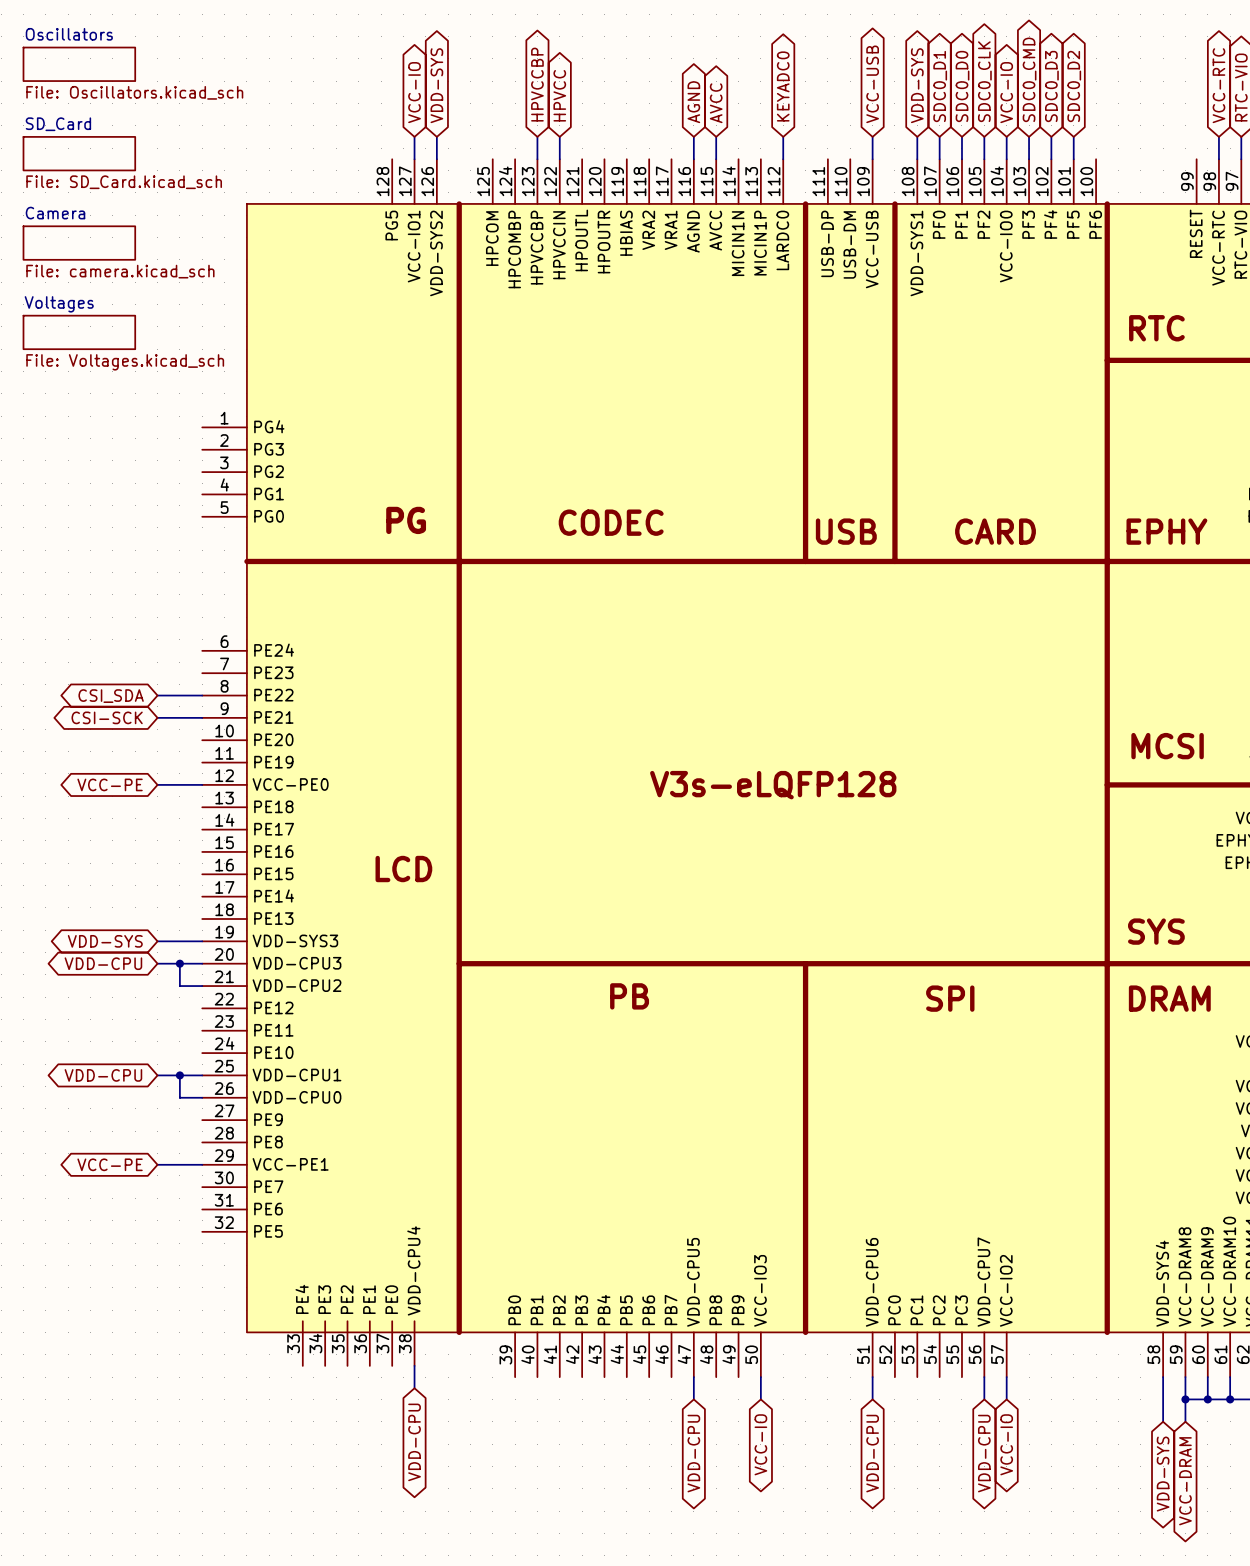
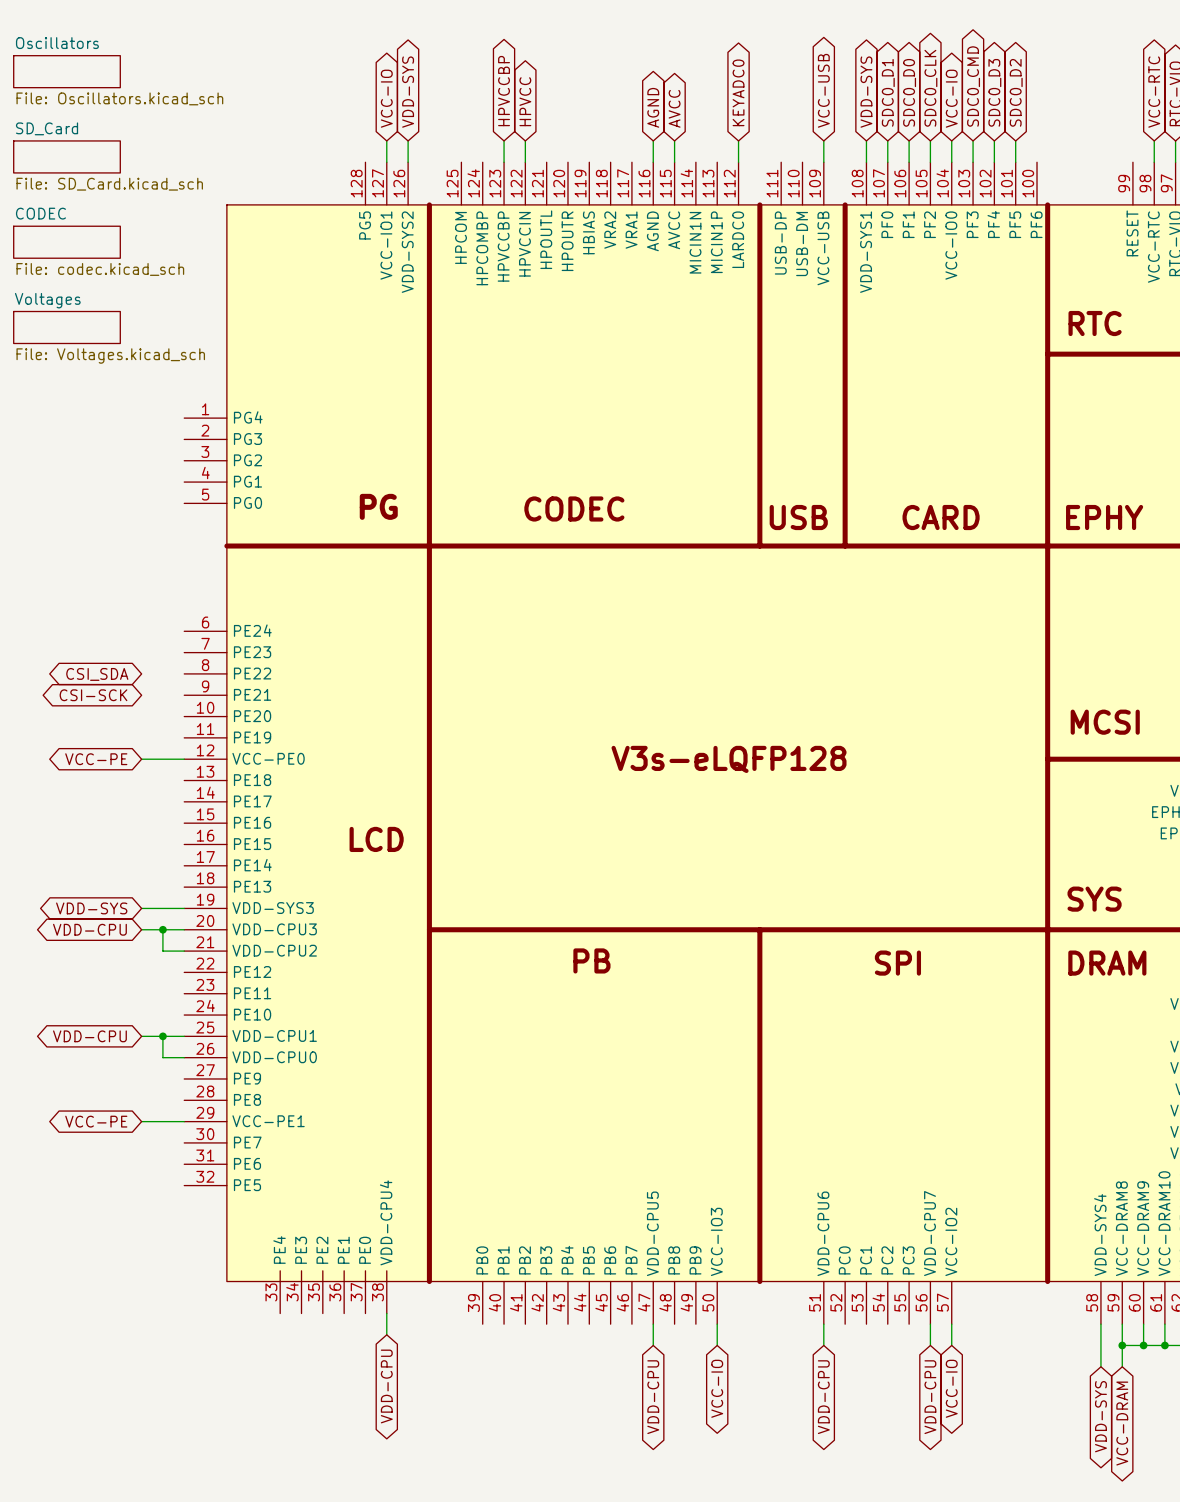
sheet Camera name: Camera (55, 213) -> CODEC (40, 213)
sheet Camera value: File: camera.kicad_sch (120, 271) -> File: codec.kicad_sch (100, 269)
wire: (157, 695) (202, 695) -> none
wire: (157, 717) (202, 717) -> none

